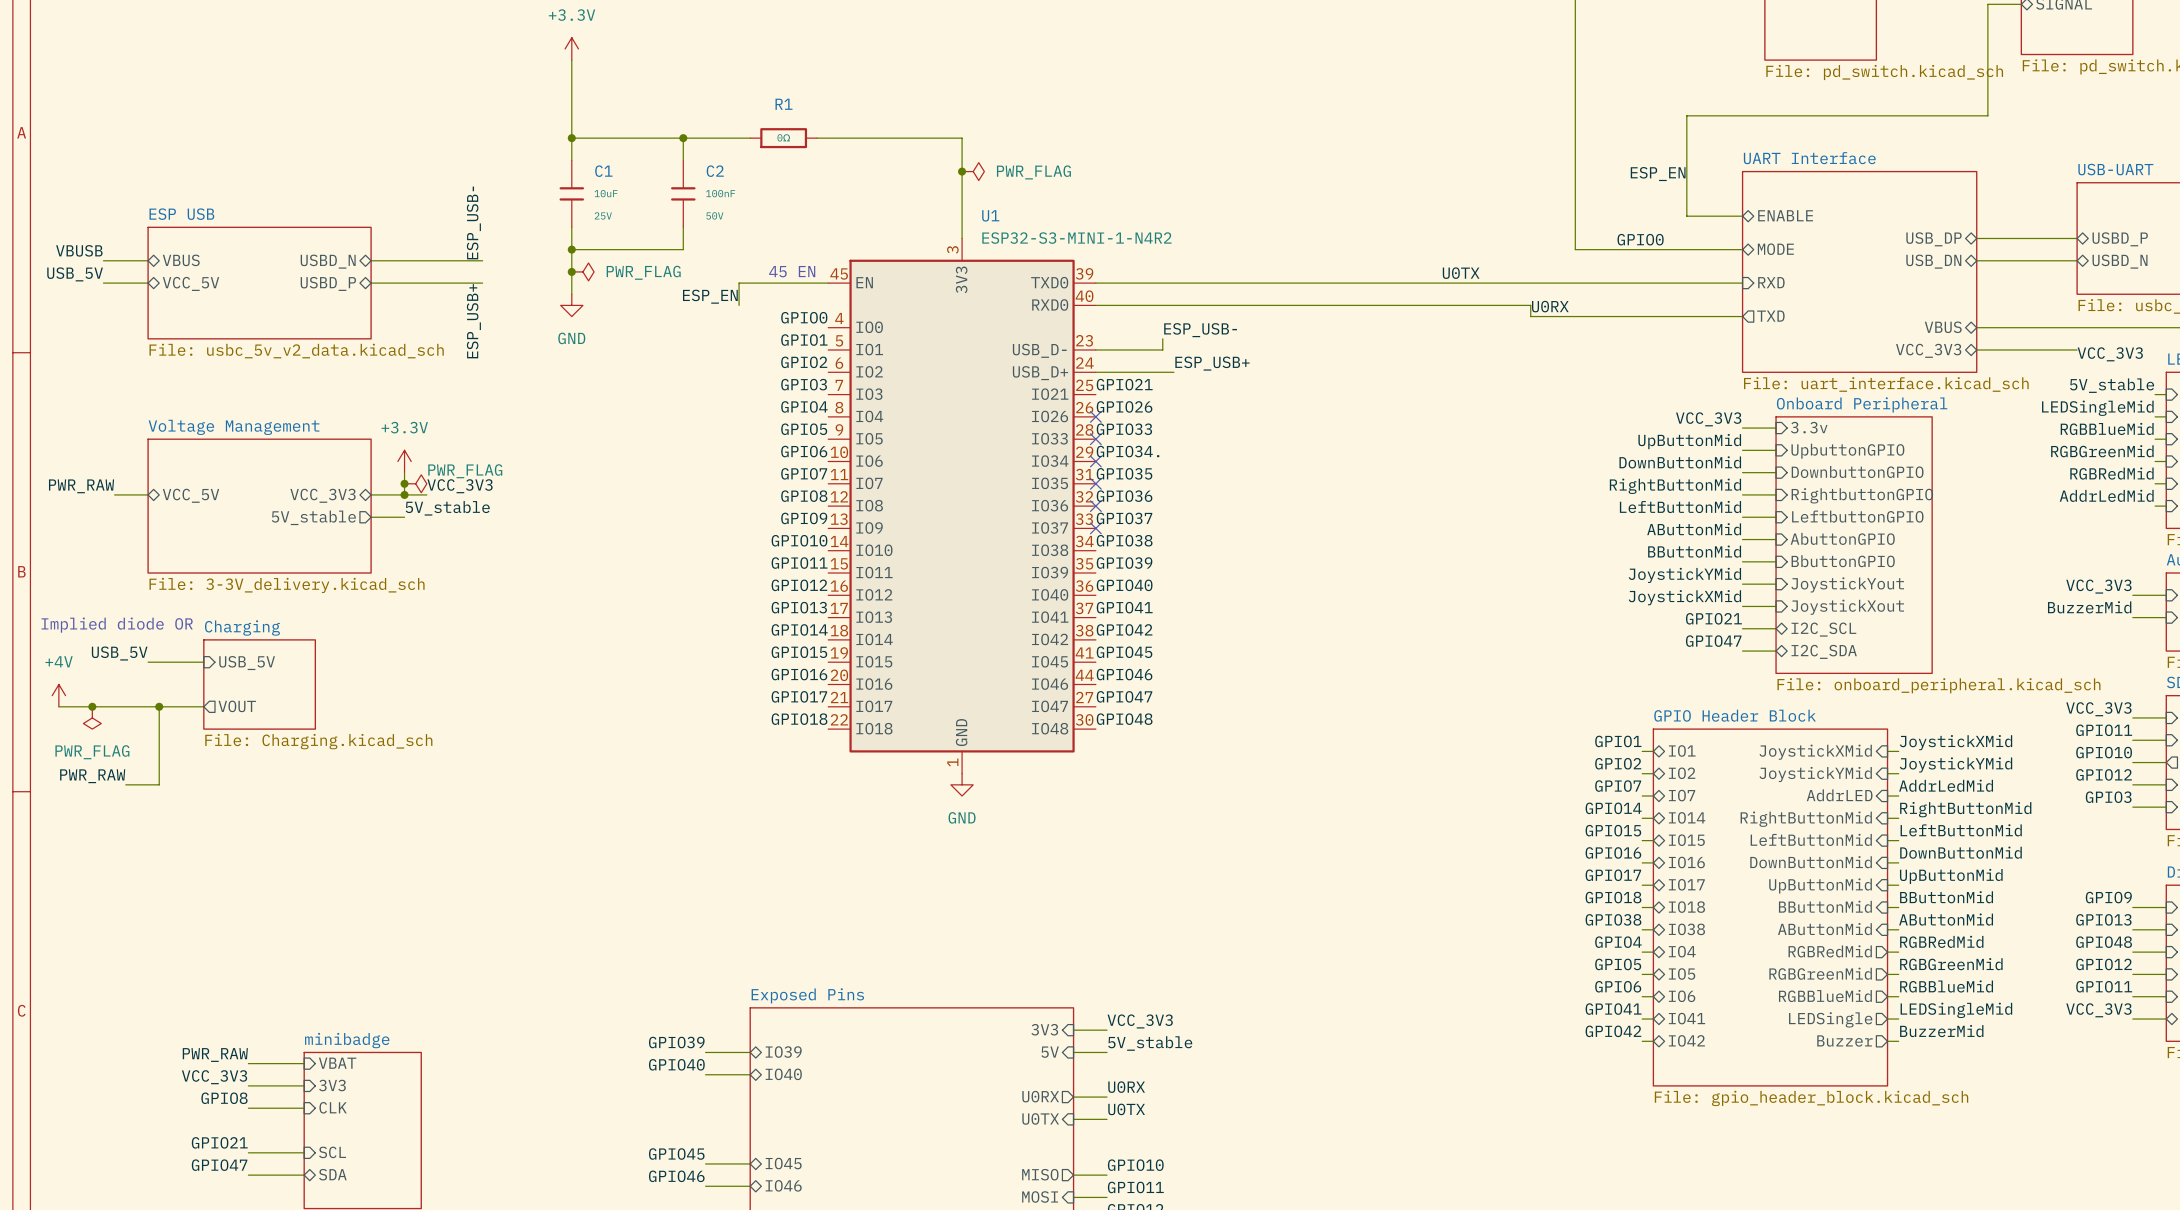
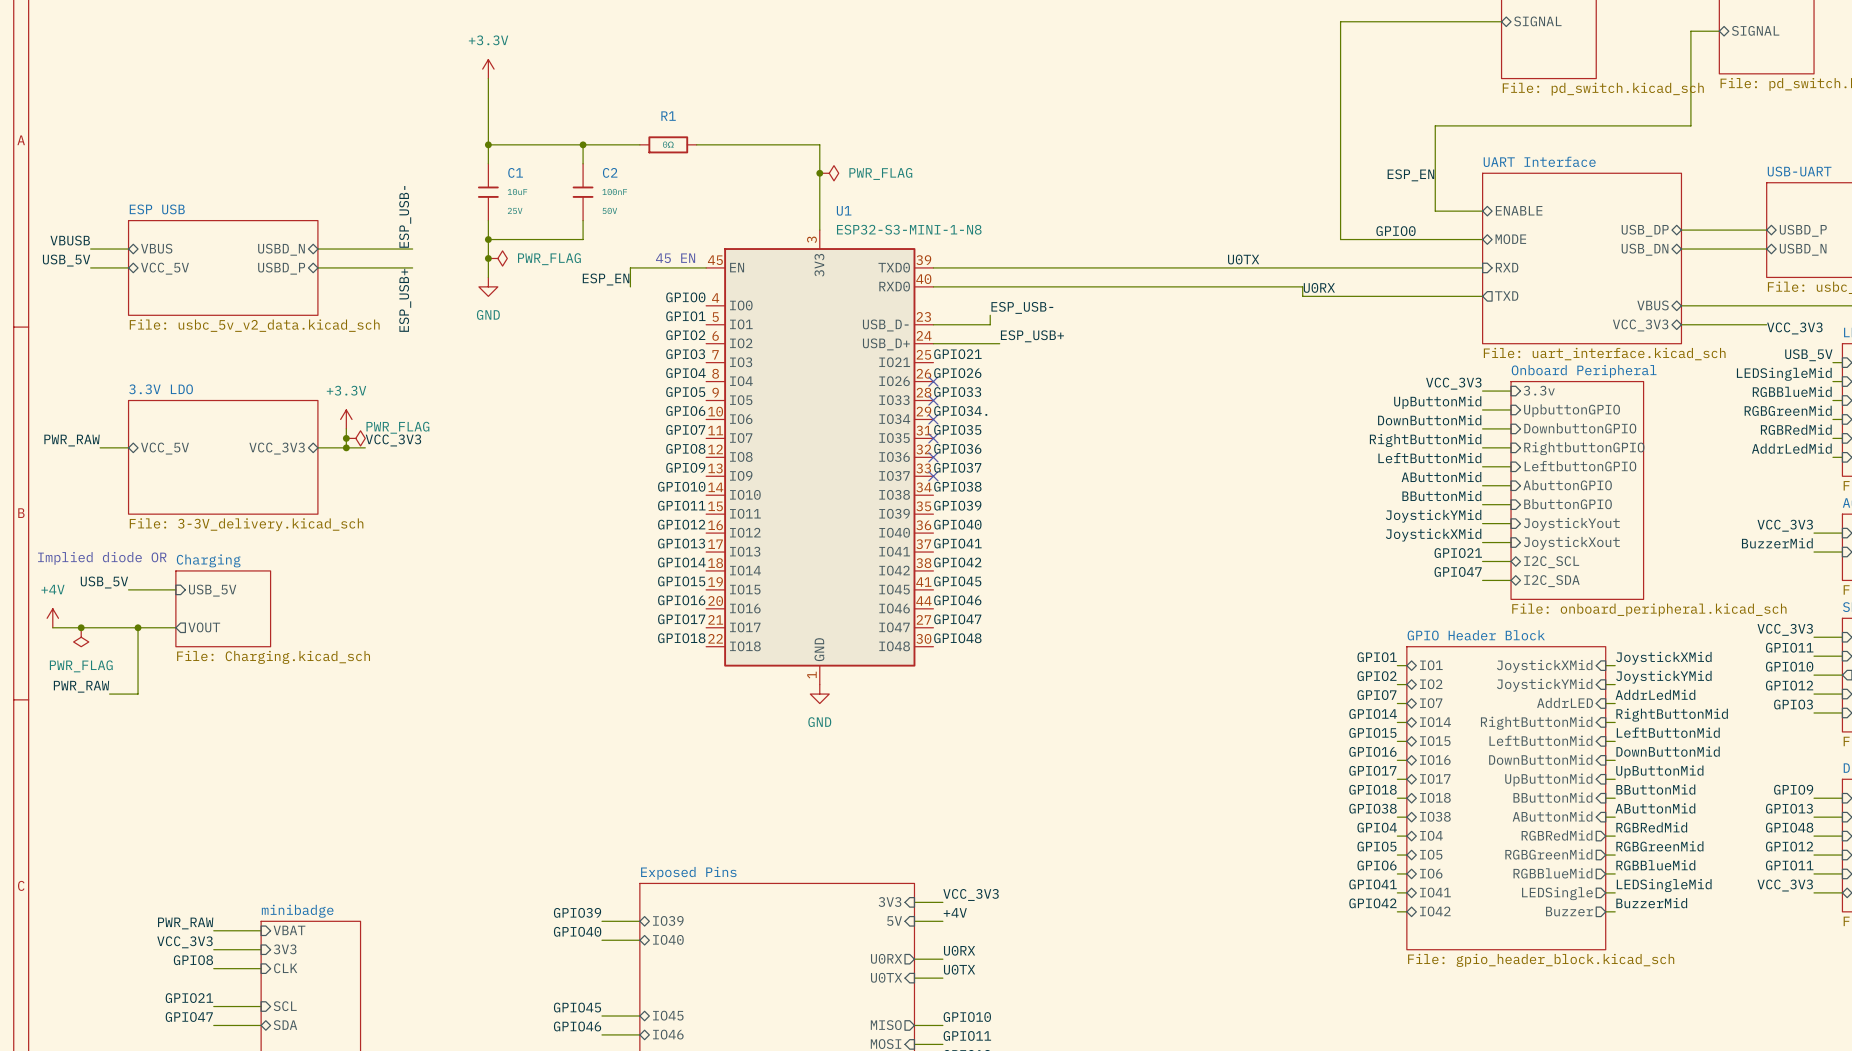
U1 value: ESP32-S3-MINI-1-N4R2 (1076, 238) -> ESP32-S3-MINI-1-N8 (909, 229)
label: 5V_stable (2112, 385) -> USB_5V (1808, 355)
sheet Voltage Management name: Voltage Management (234, 427) -> 3.3V LDO (161, 389)
label: 5V_stable (447, 508) -> none
sheet pin: 5V_stable (313, 517) -> none
wire: (371, 517) (404, 517) -> none
label: 5V_stable (1150, 1043) -> +4V (955, 912)

